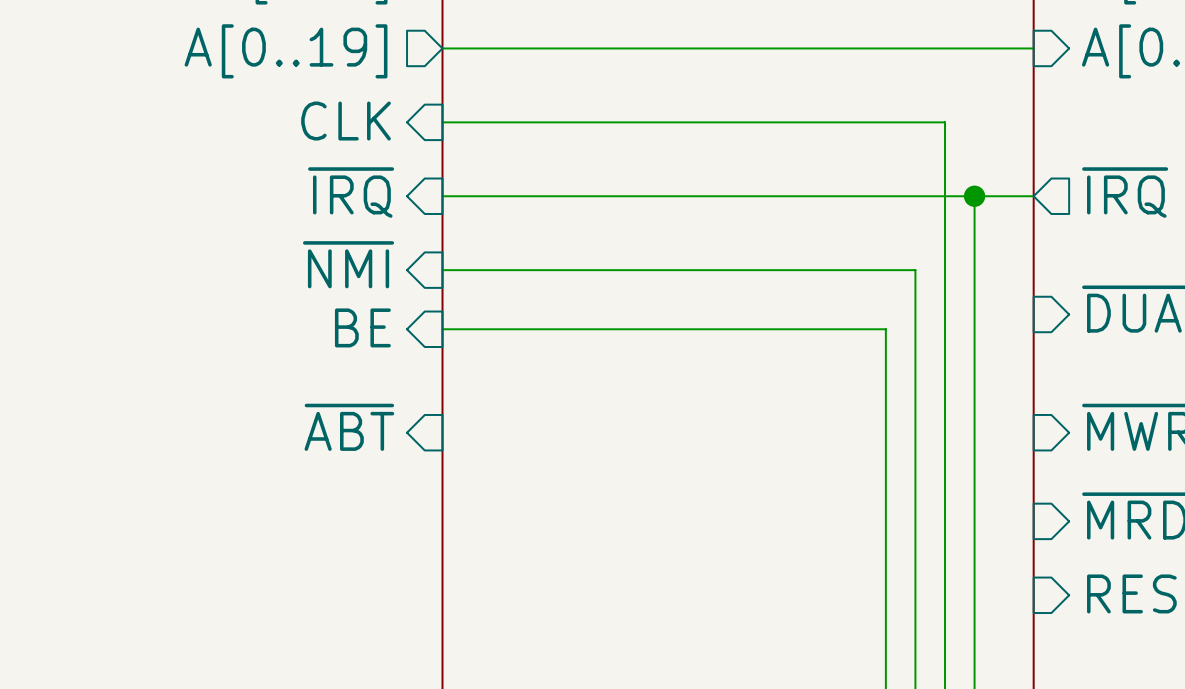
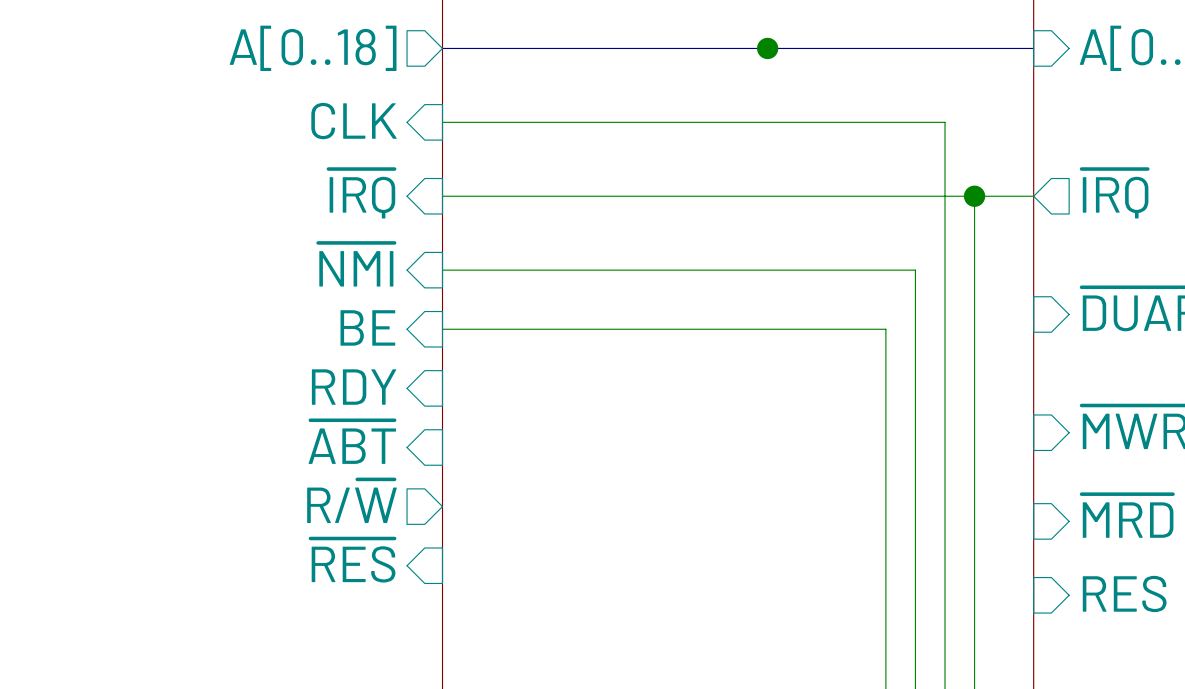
bus: none -> (442, 48) (1033, 48)
junction: none -> (767, 48)
sheet pin: A[0..19] (286, 51) -> A[0..18] (313, 48)
sheet pin: none -> RDY (354, 387)
sheet pin position: ~{ABT} (349, 427) -> ~{ABT} (352, 442)
sheet pin: none -> R/~{W} (351, 501)
sheet pin: none -> ~{RES} (352, 560)

